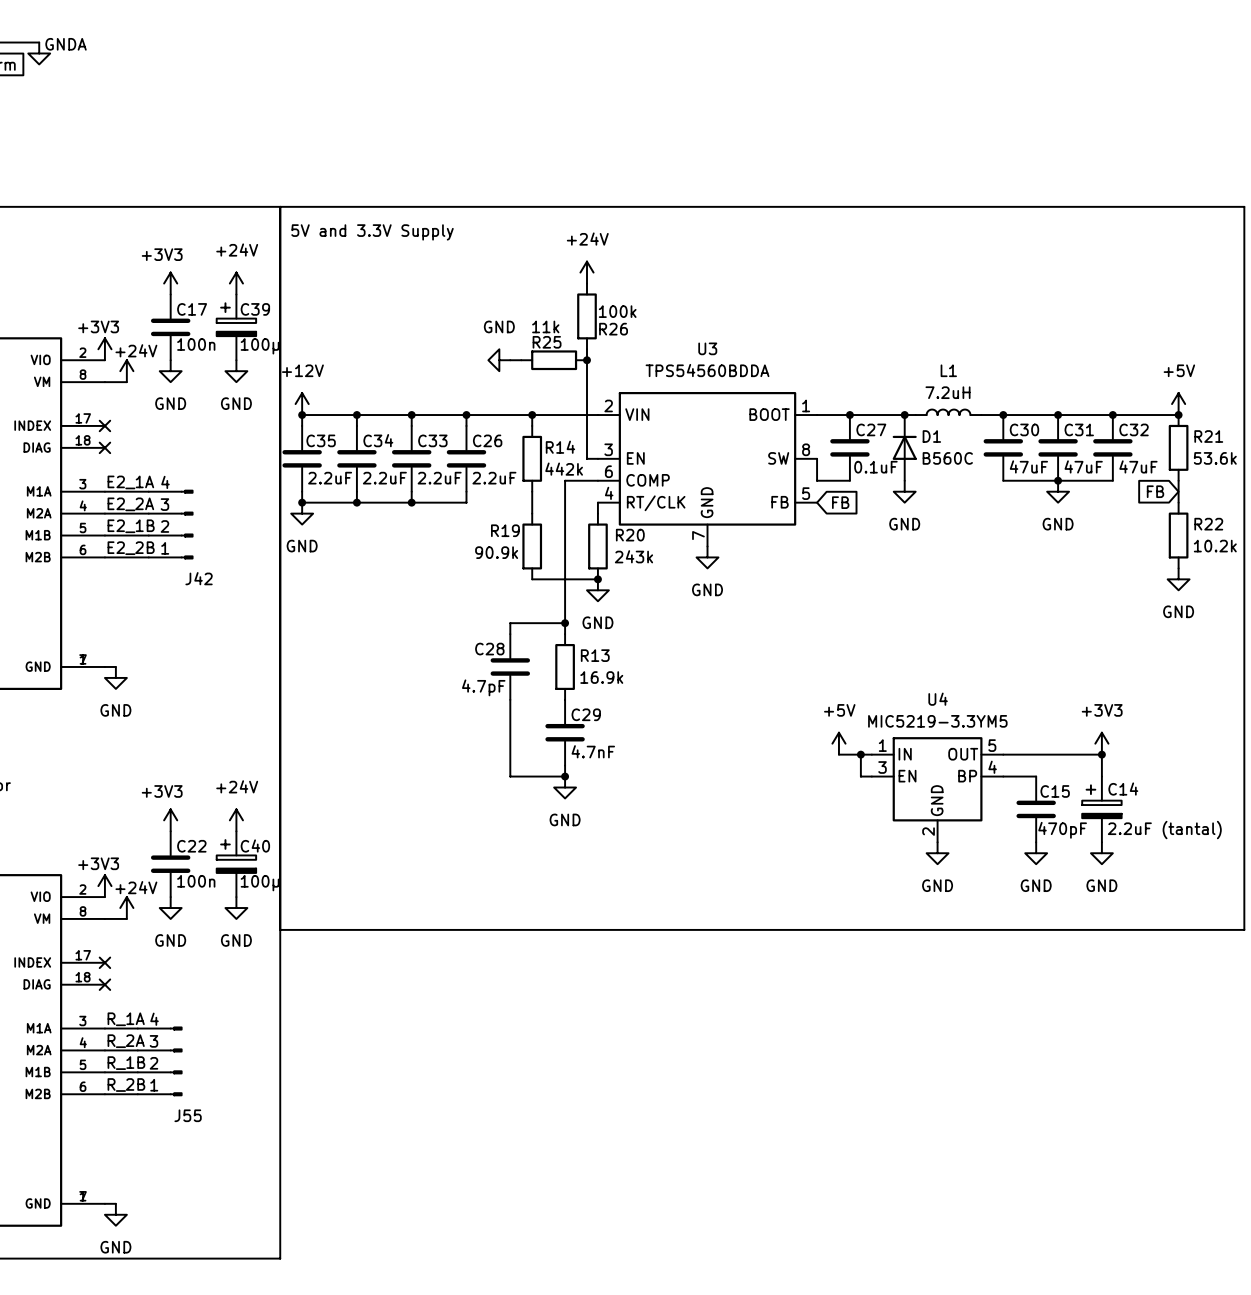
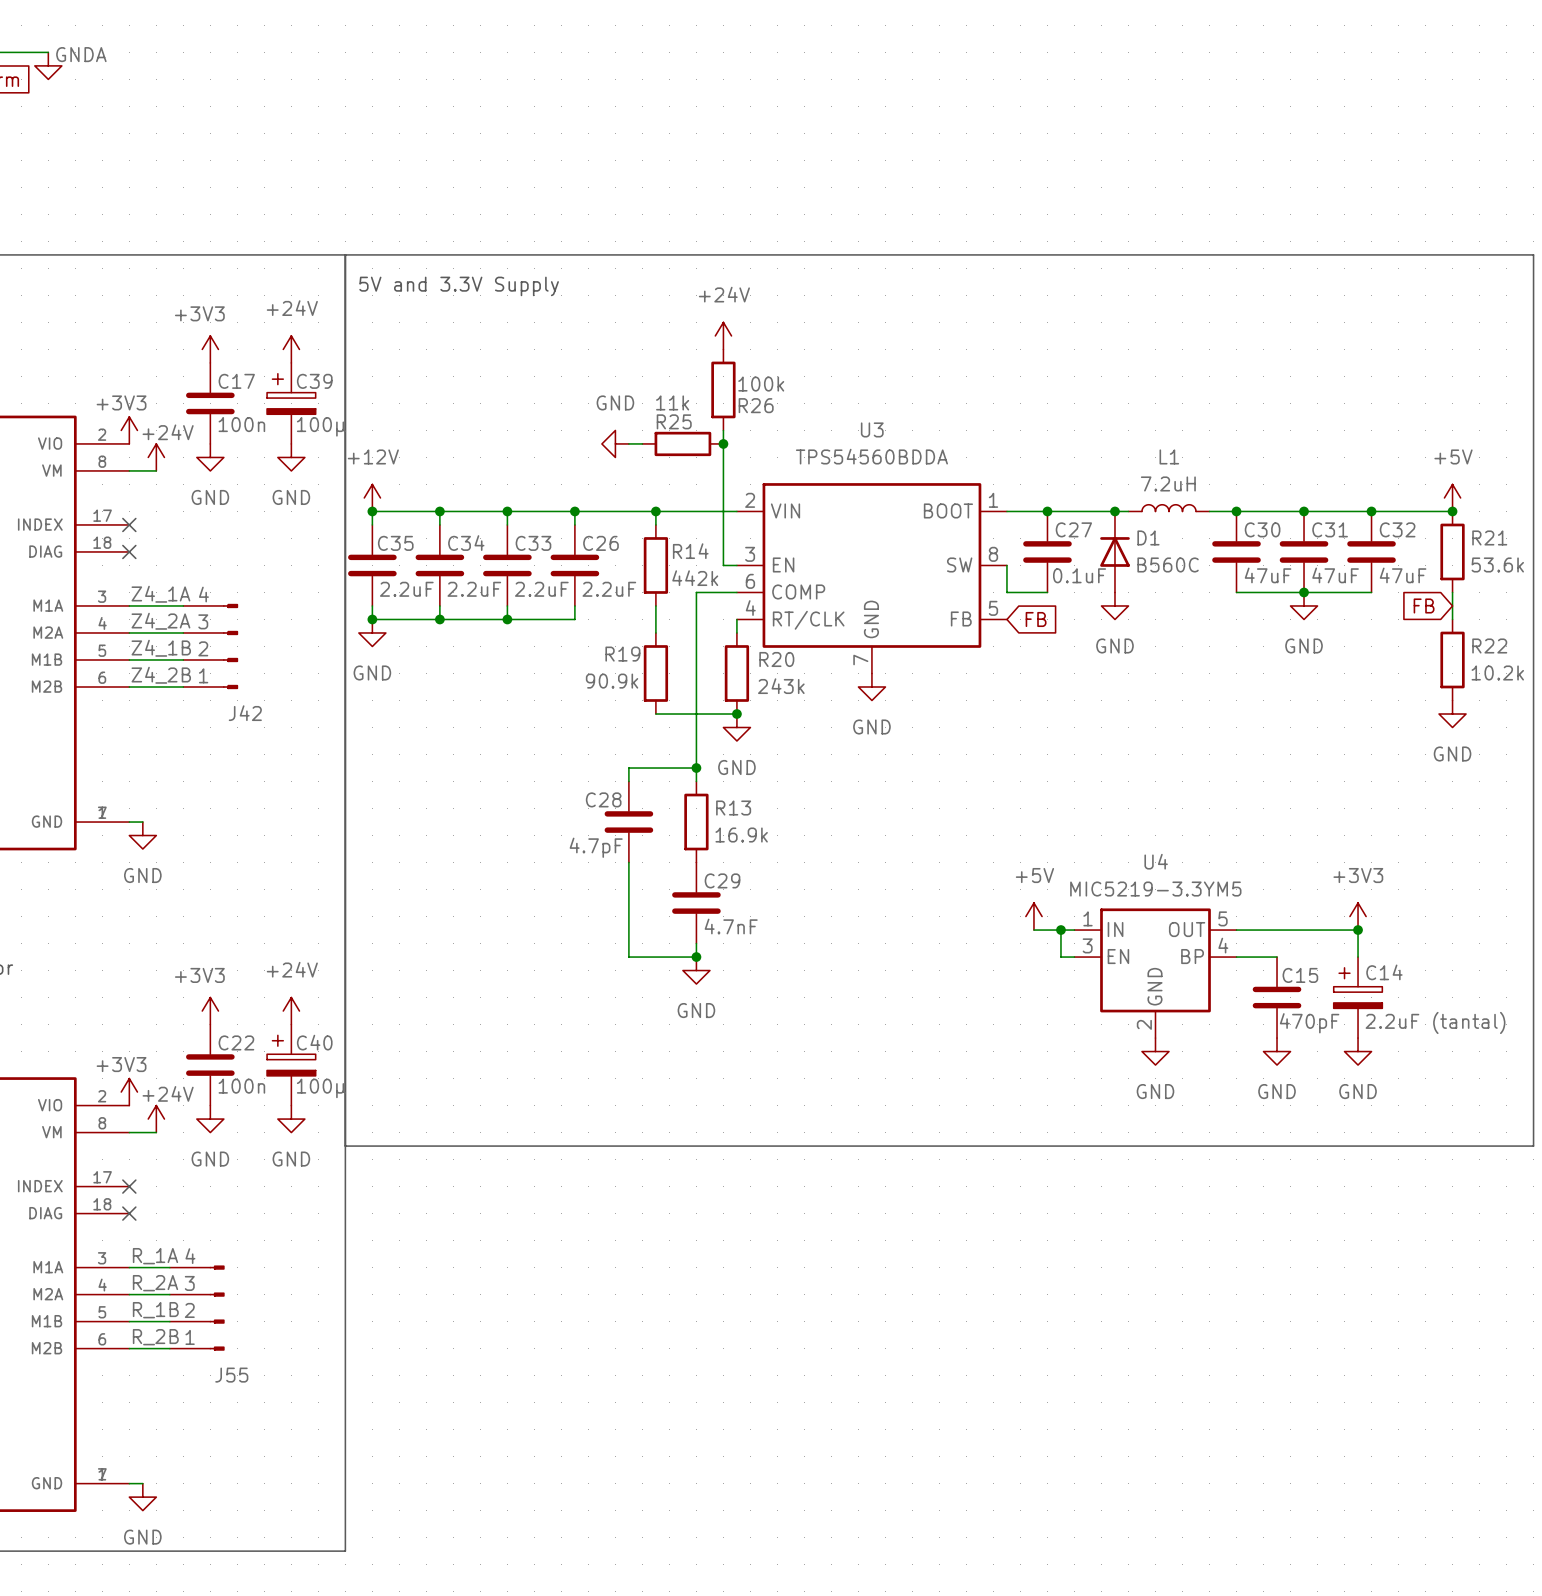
label: E2_1A (130, 482) -> Z4_1A (160, 594)
label: E2_2A (130, 504) -> Z4_2A (160, 621)
label: E2_1B (131, 526) -> Z4_1B (161, 648)
label: E2_2B (131, 548) -> Z4_2B (161, 675)

